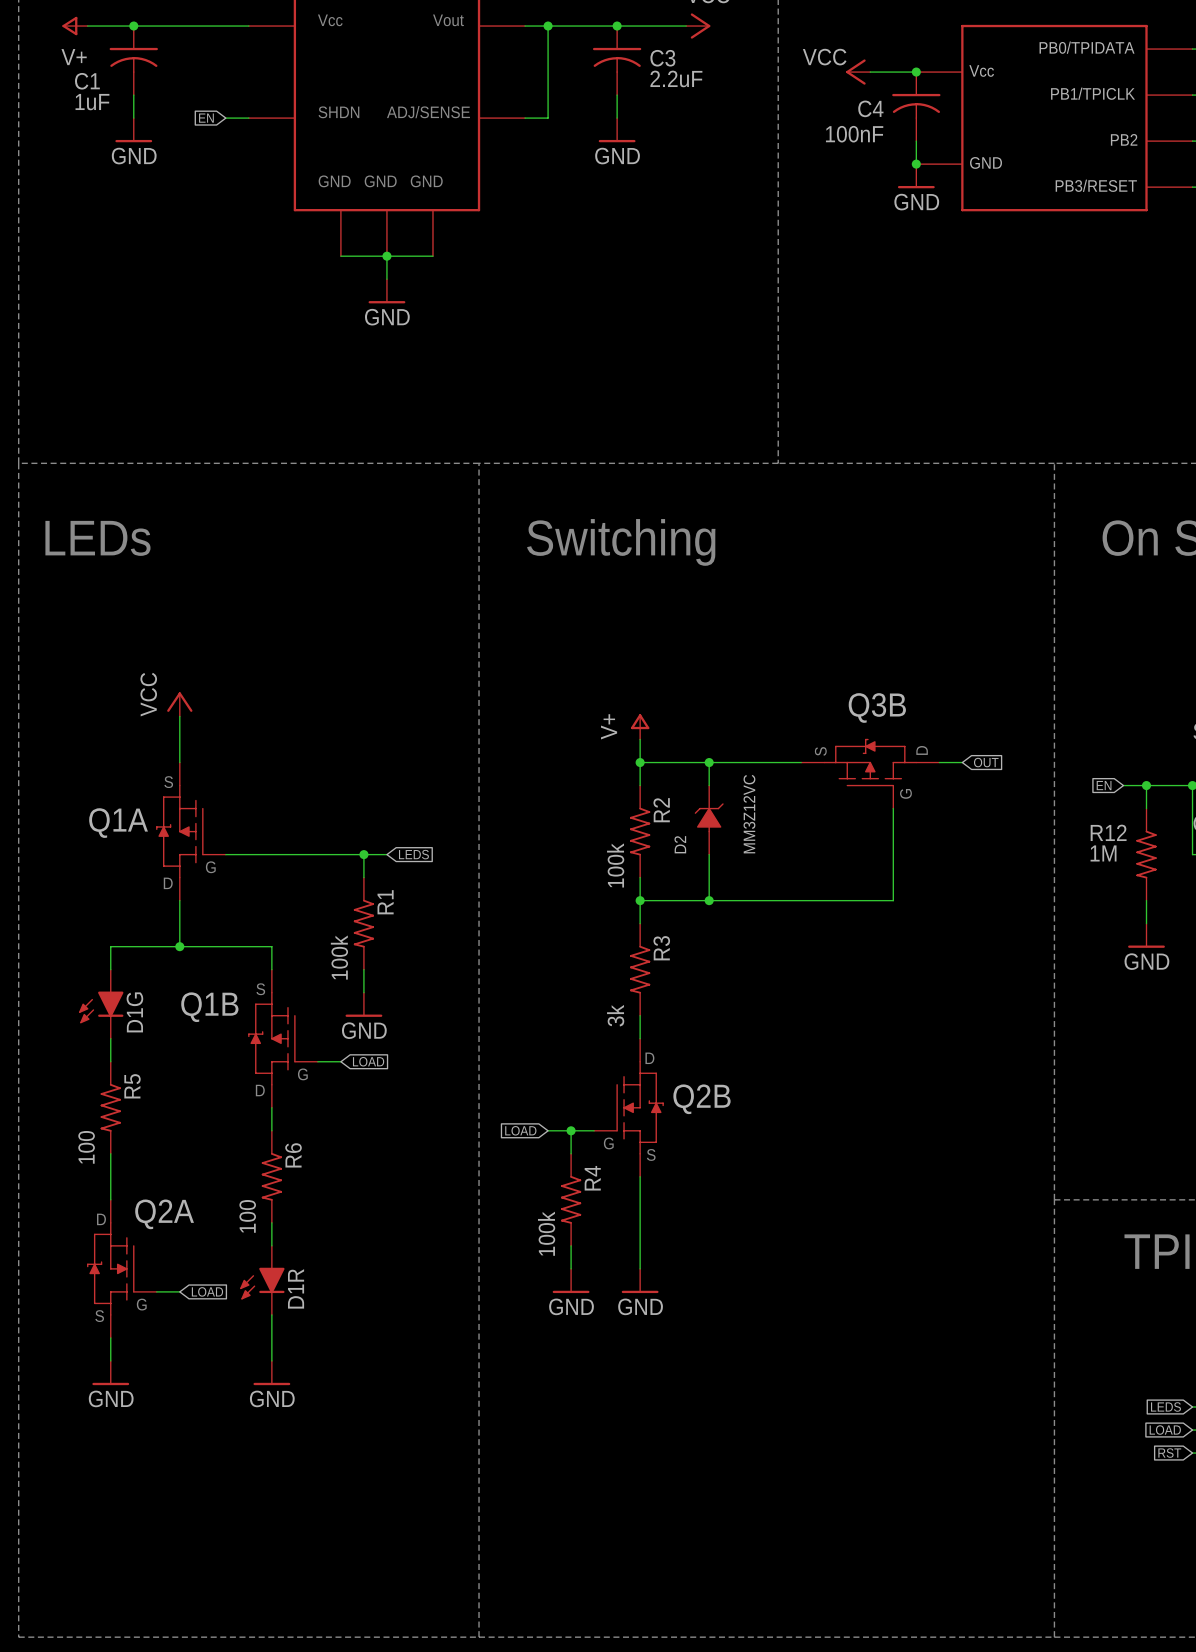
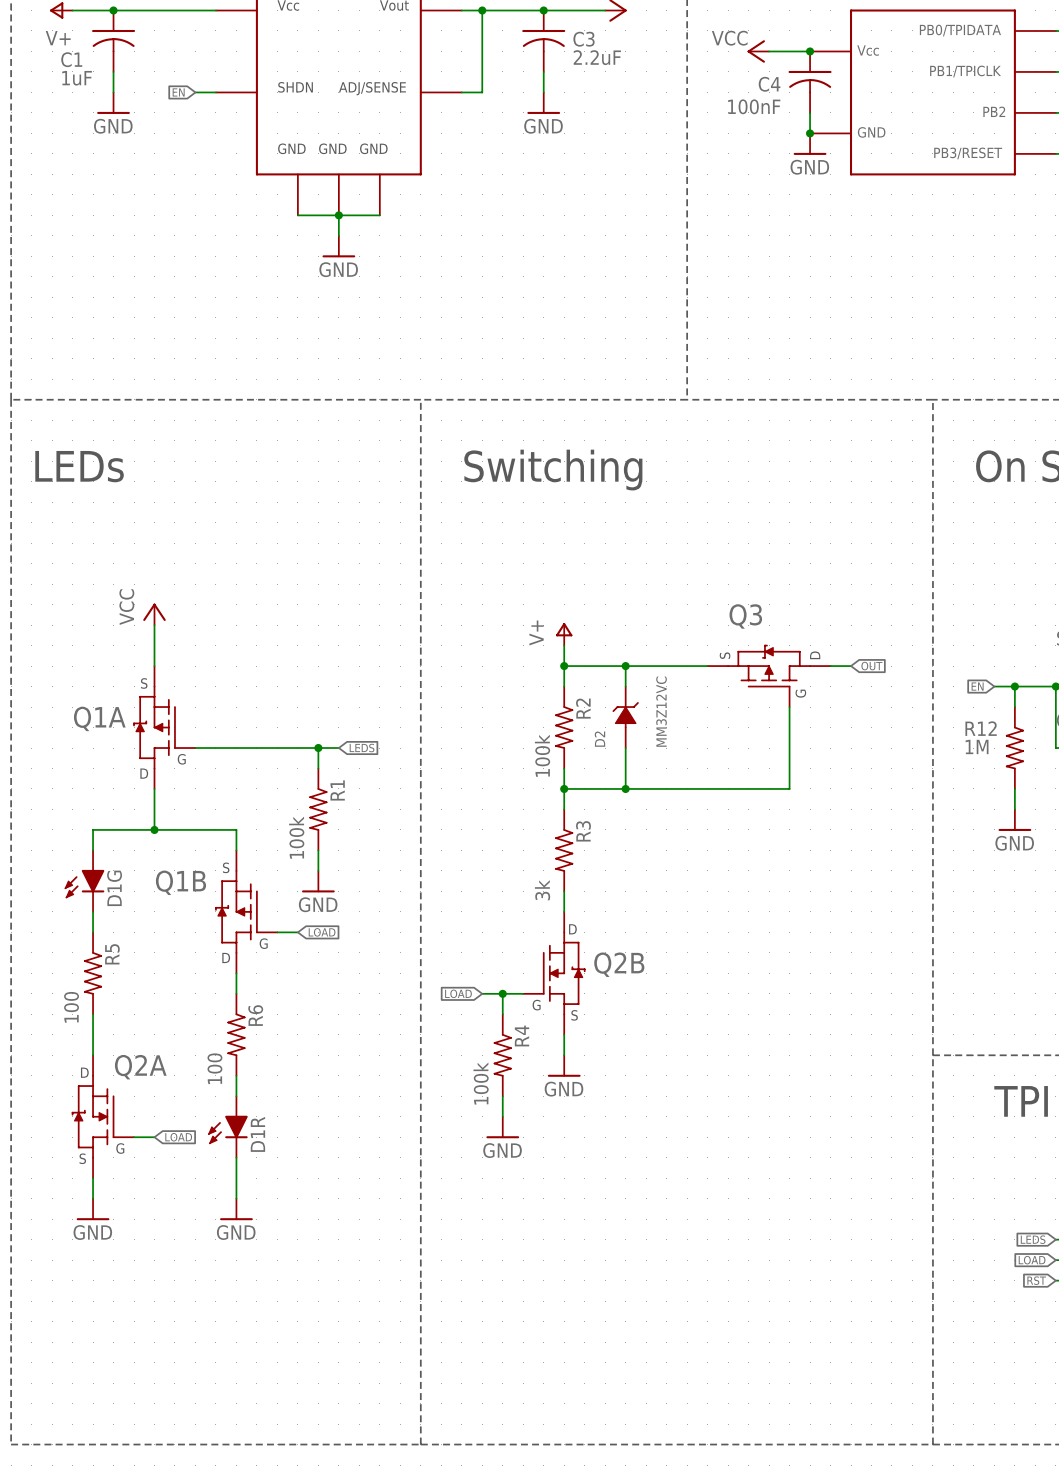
Q3B name: Q3B (877, 707) -> Q3 (745, 616)
wire: (640, 1199) (640, 1268) -> none
power symbol position: GND (640, 1280) -> GND (564, 1066)

